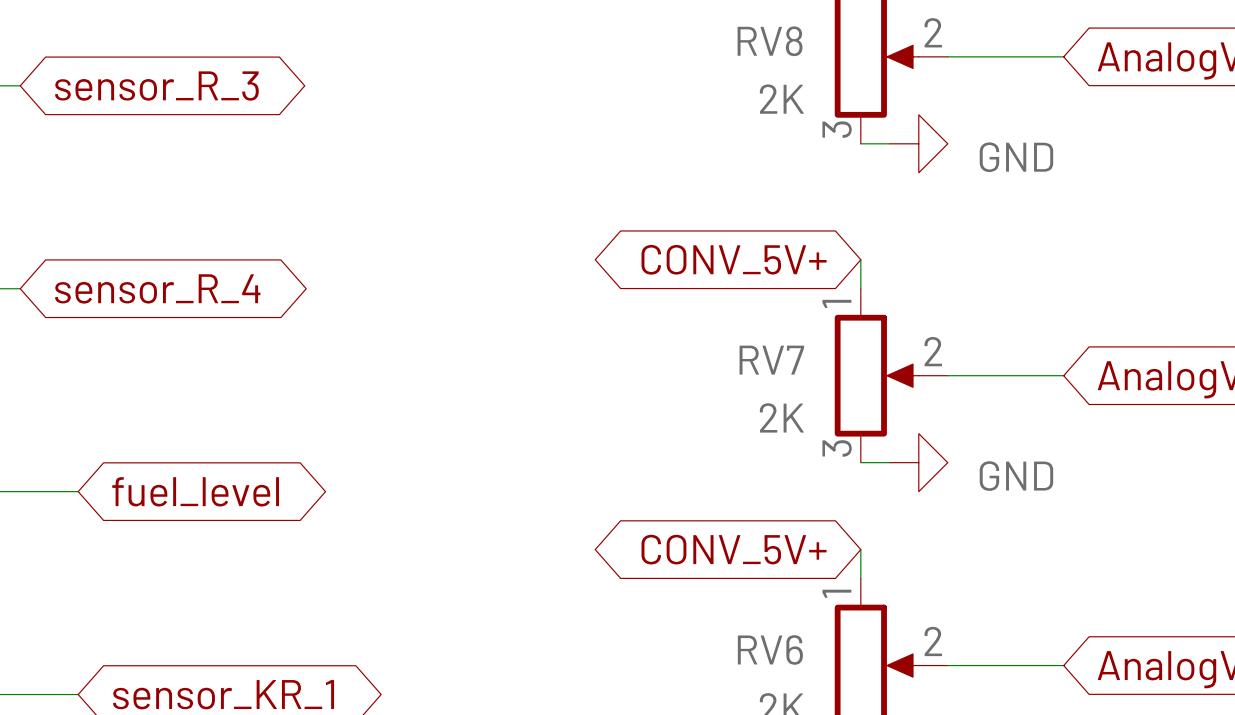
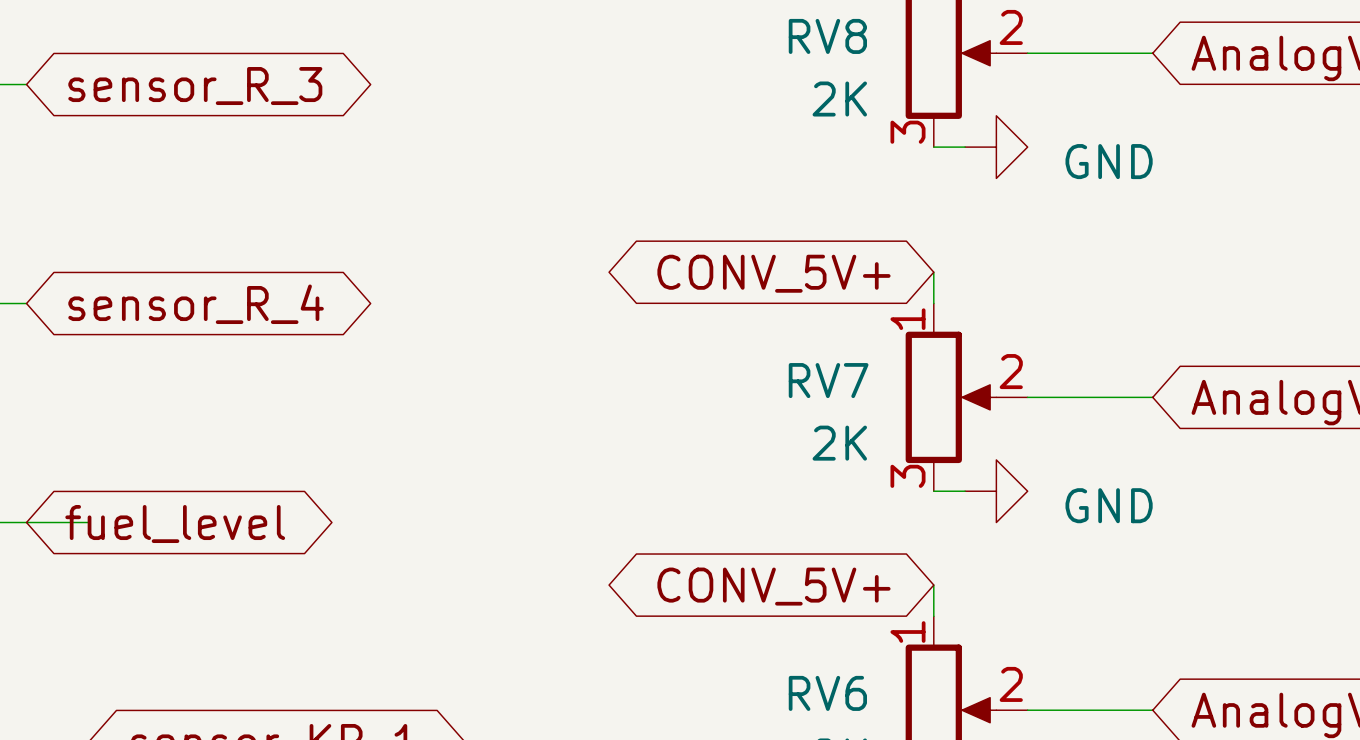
global label position: fuel_level (195, 491) -> fuel_level (175, 524)

